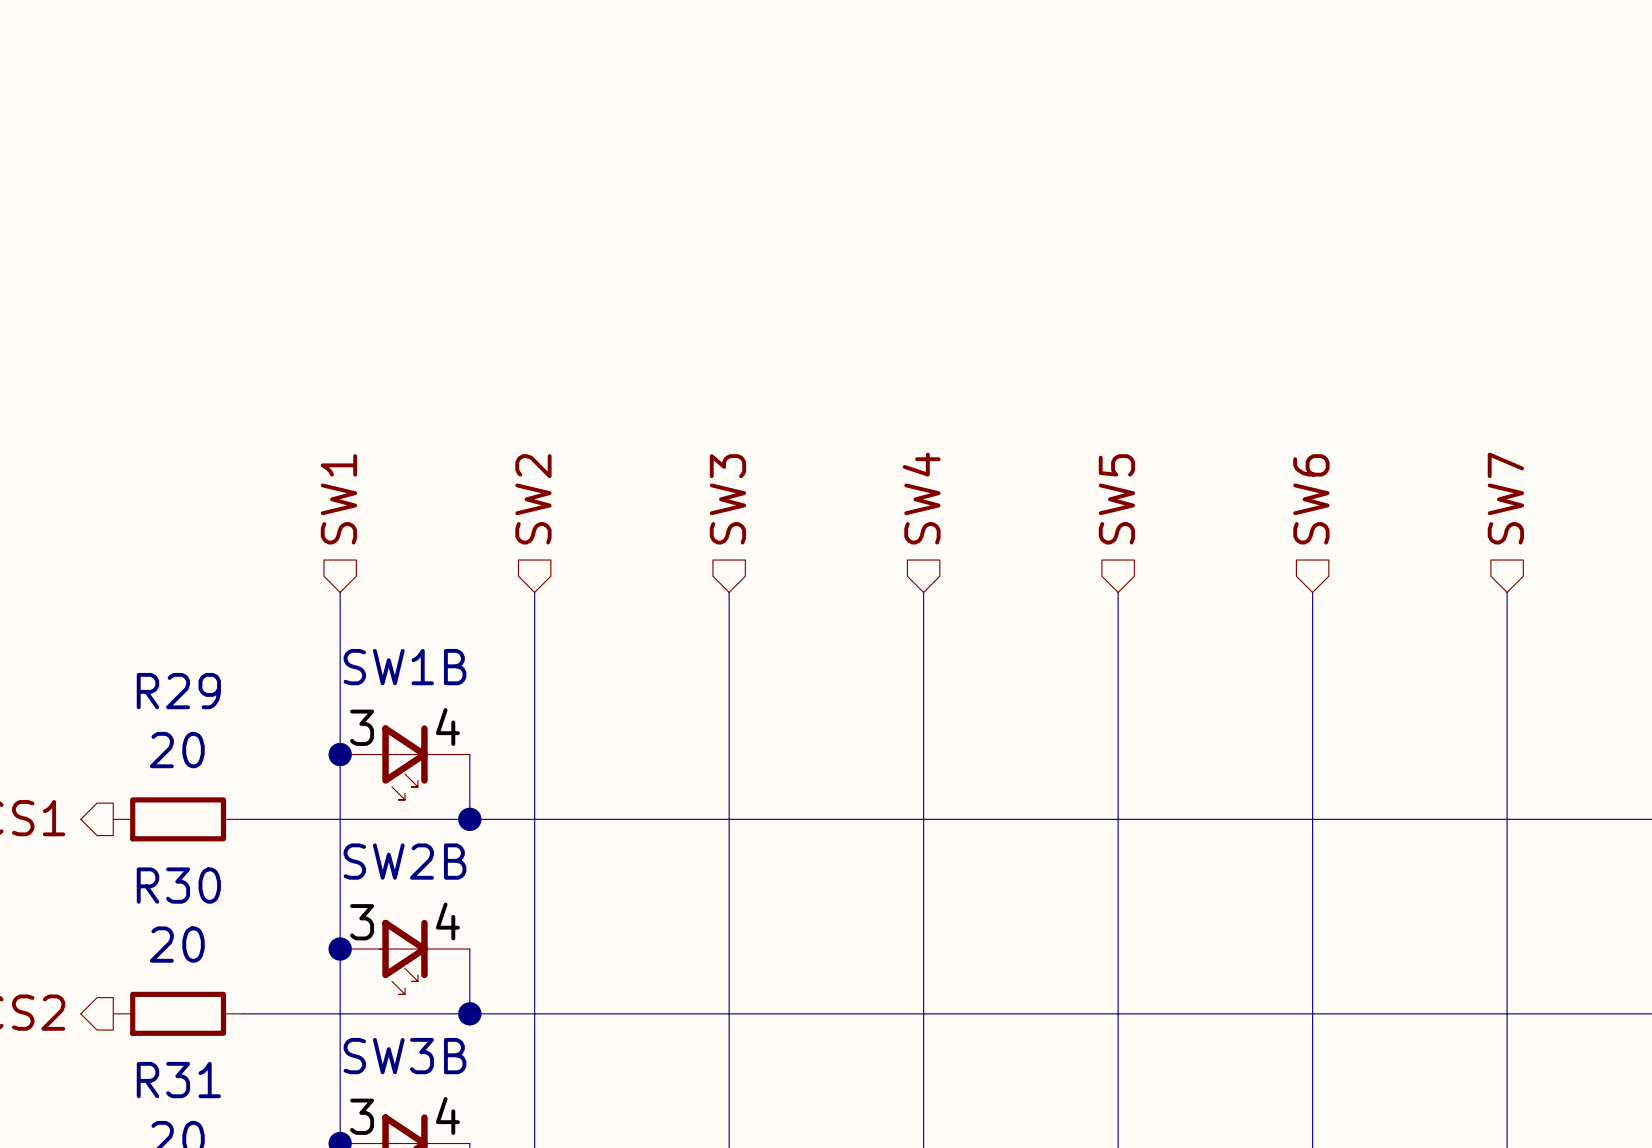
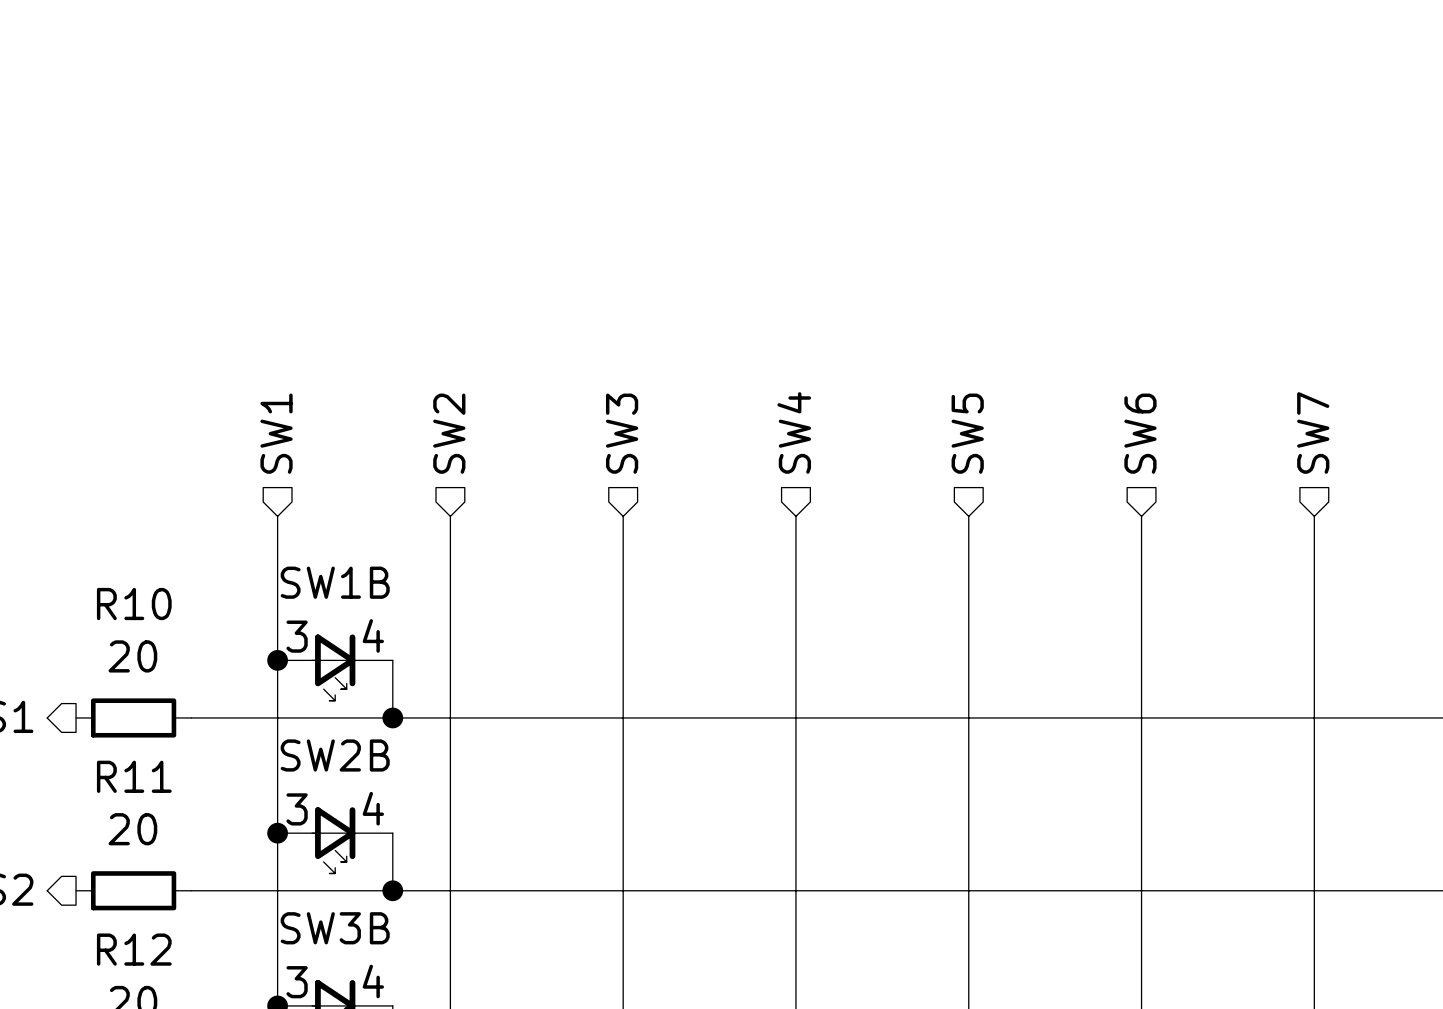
R29 name: R29 (178, 691) -> R10 (134, 604)
R30 name: R30 (178, 885) -> R11 (134, 776)
R31 name: R31 (178, 1080) -> R12 (134, 949)

